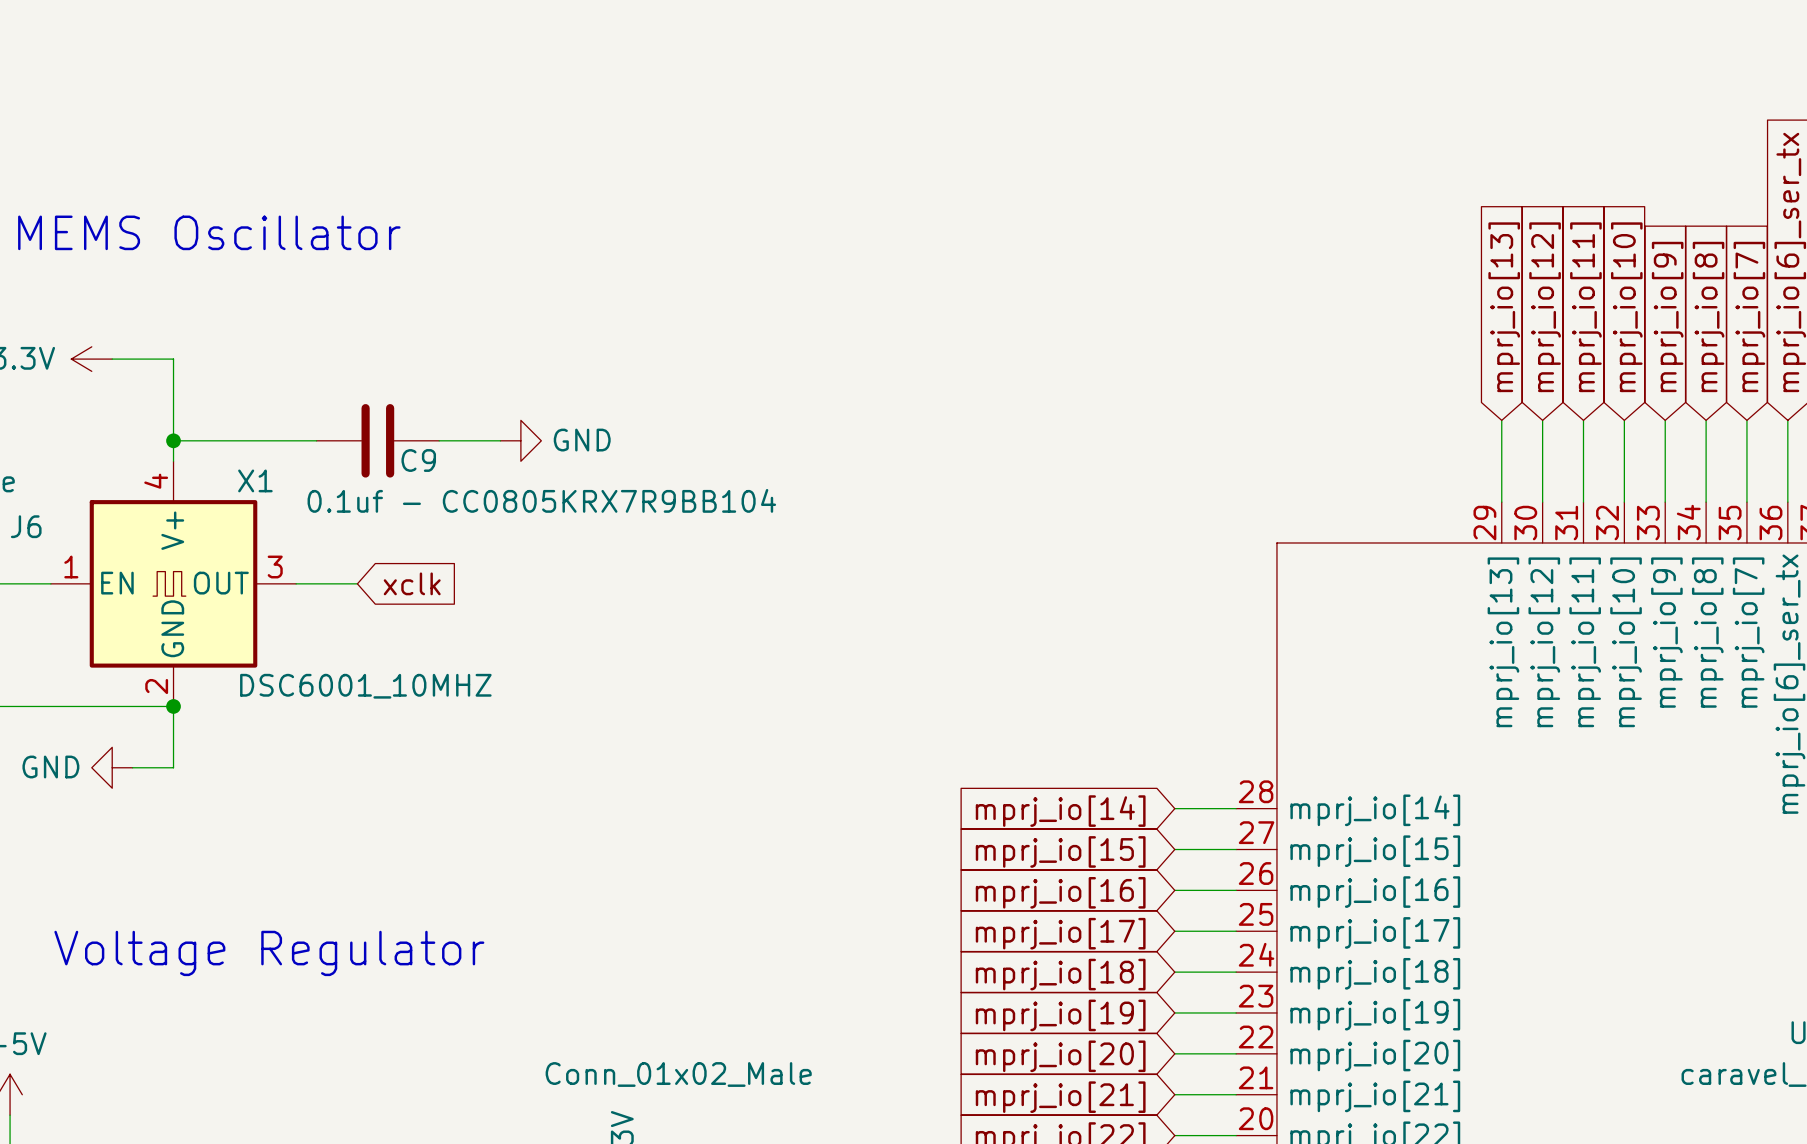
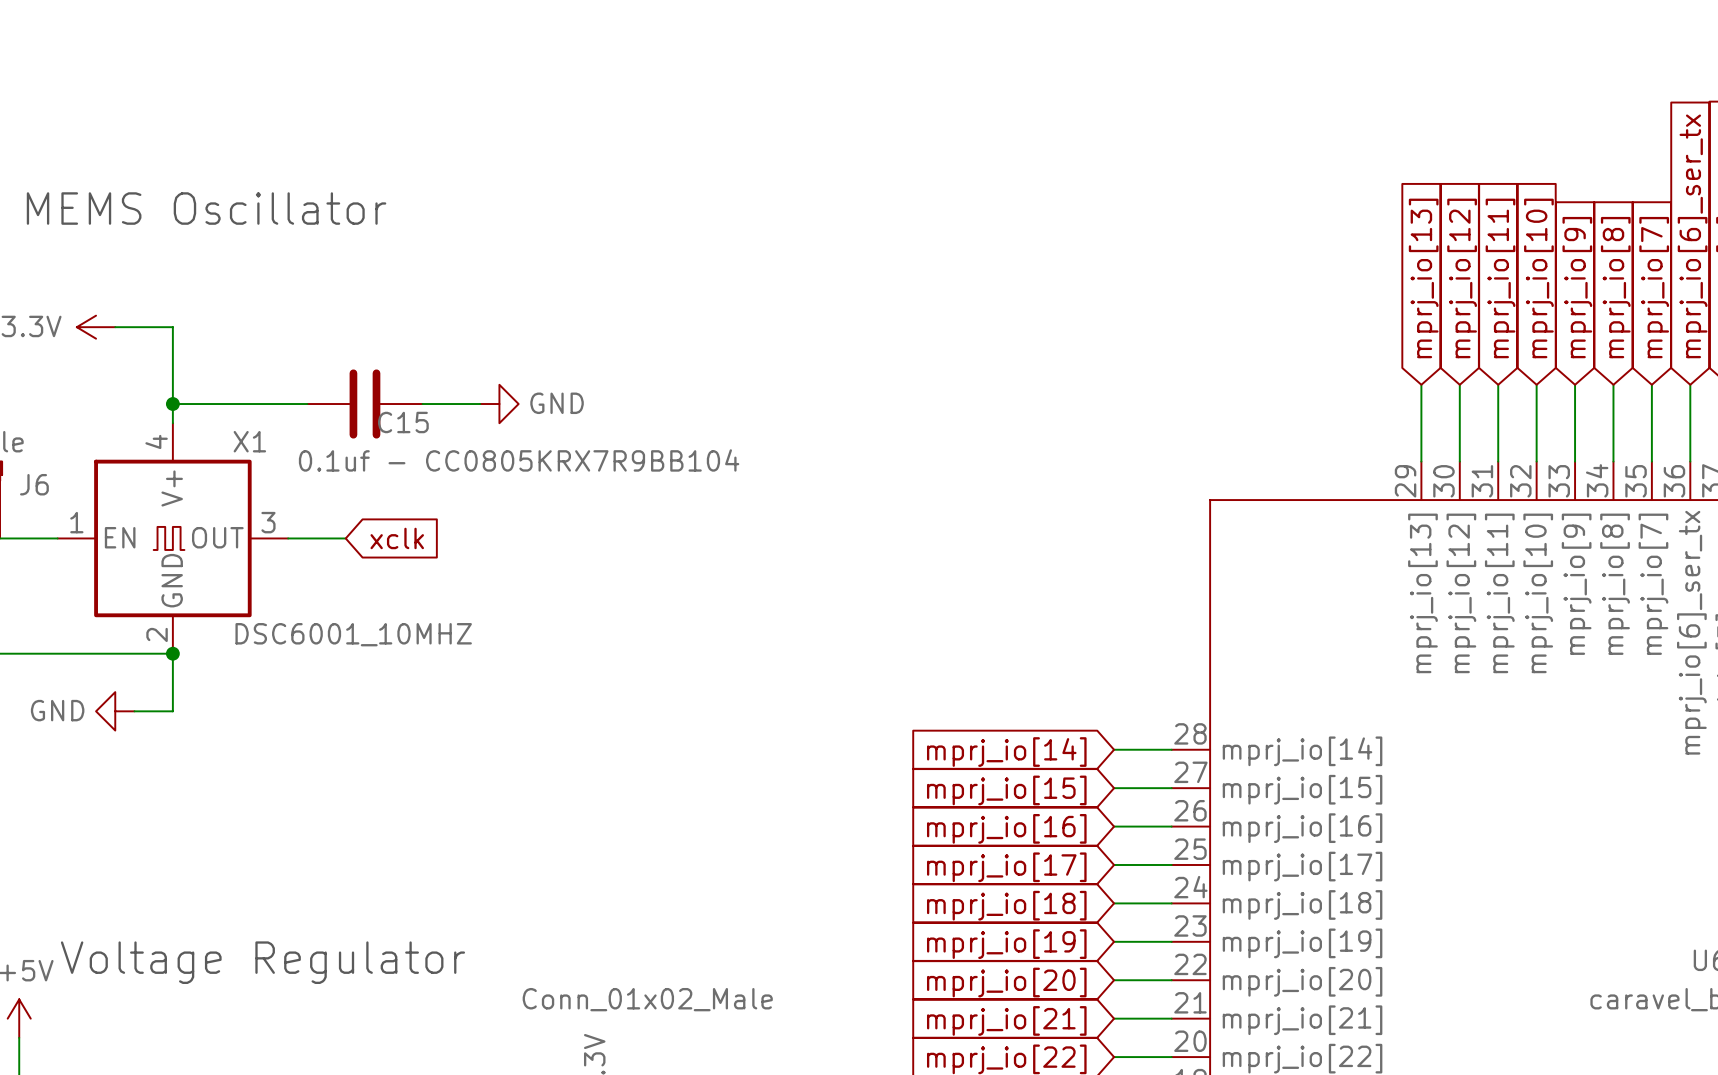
C9 name: C9 (418, 460) -> C15 (403, 422)
text position: Voltage Regulator (269, 953) -> Voltage Regulator (262, 962)

